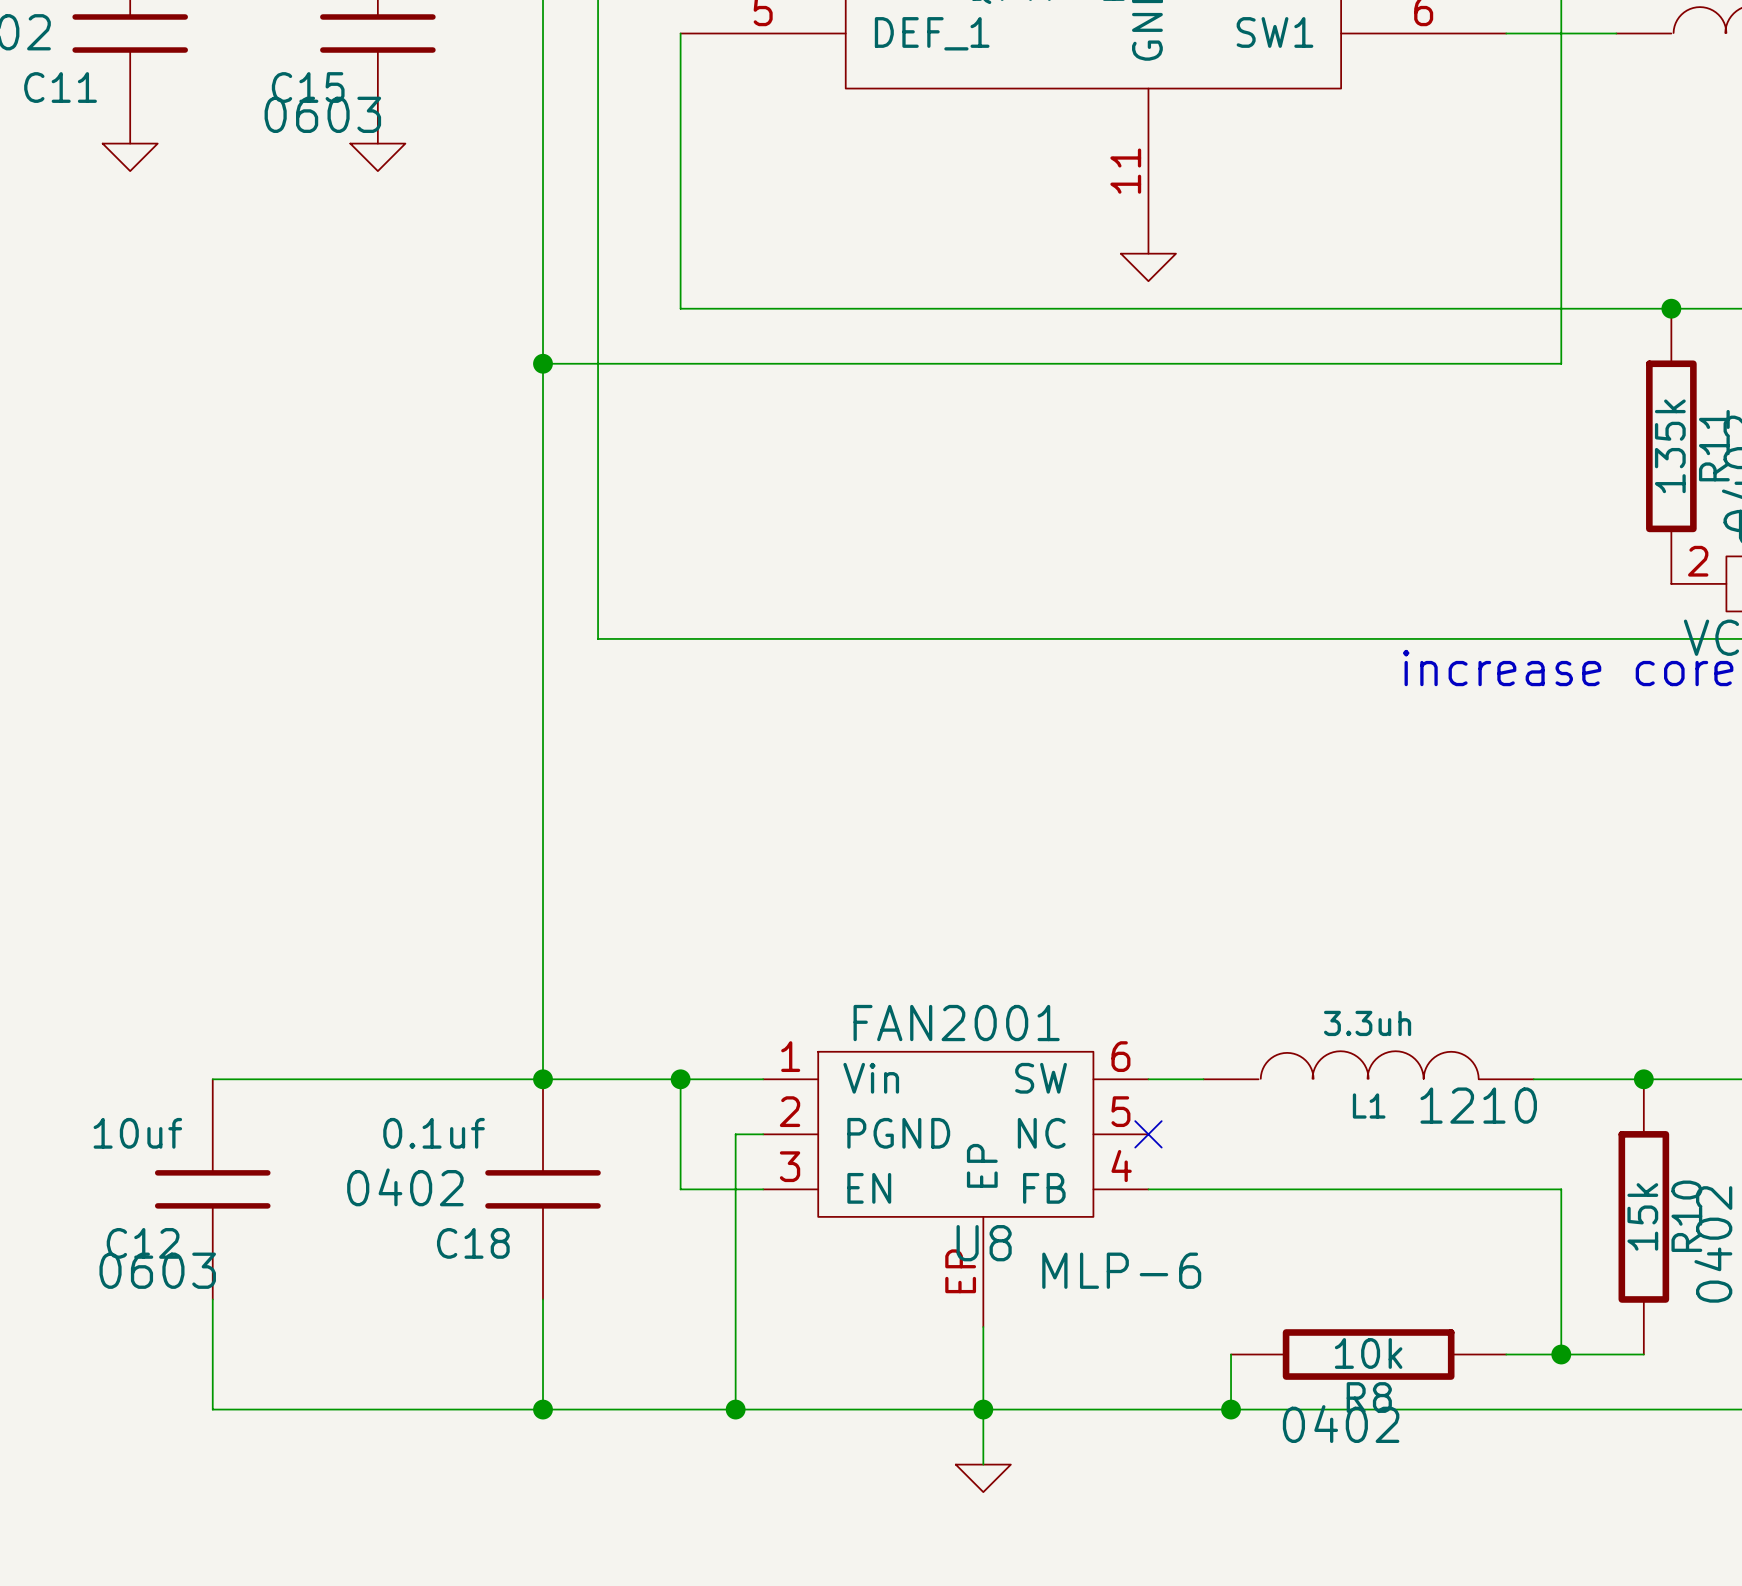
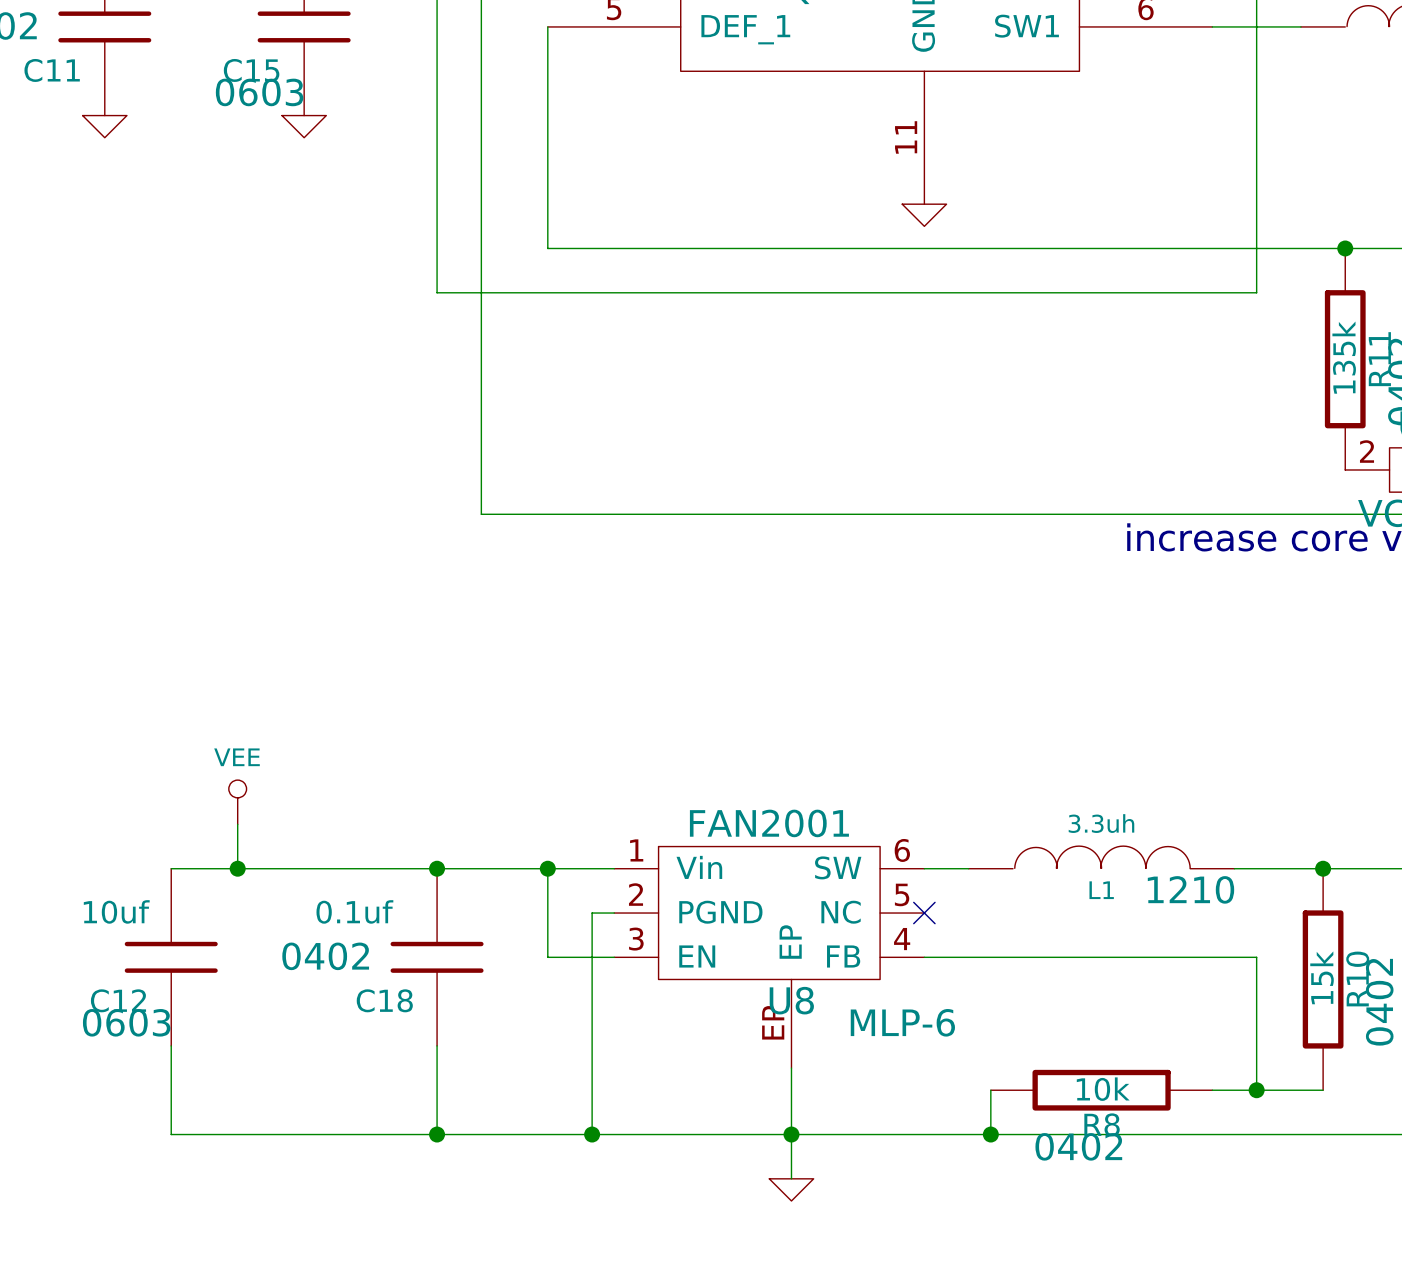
wire: (543, 363) (543, 1079) -> none
junction: (543, 363) -> none
power symbol: none -> VEE (237, 802)
wire: none -> (237, 824) (237, 868)
junction: none -> (237, 868)

